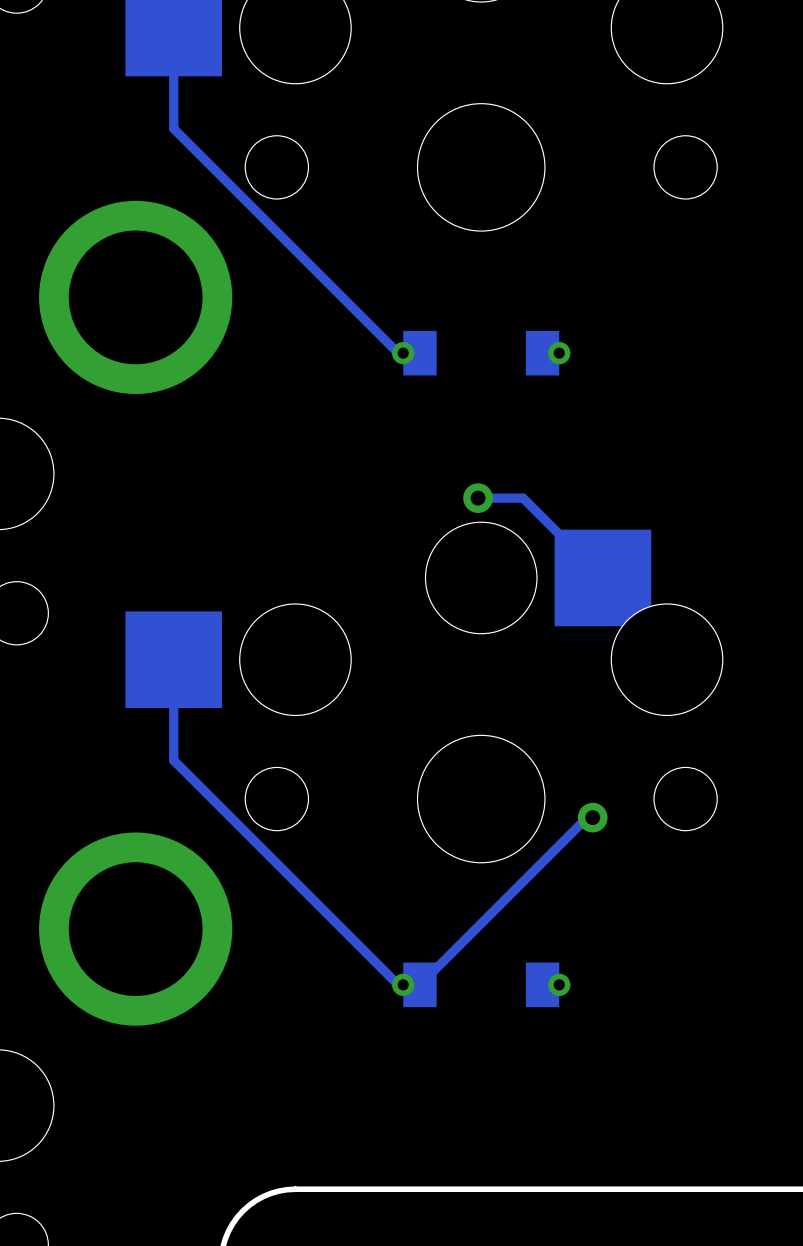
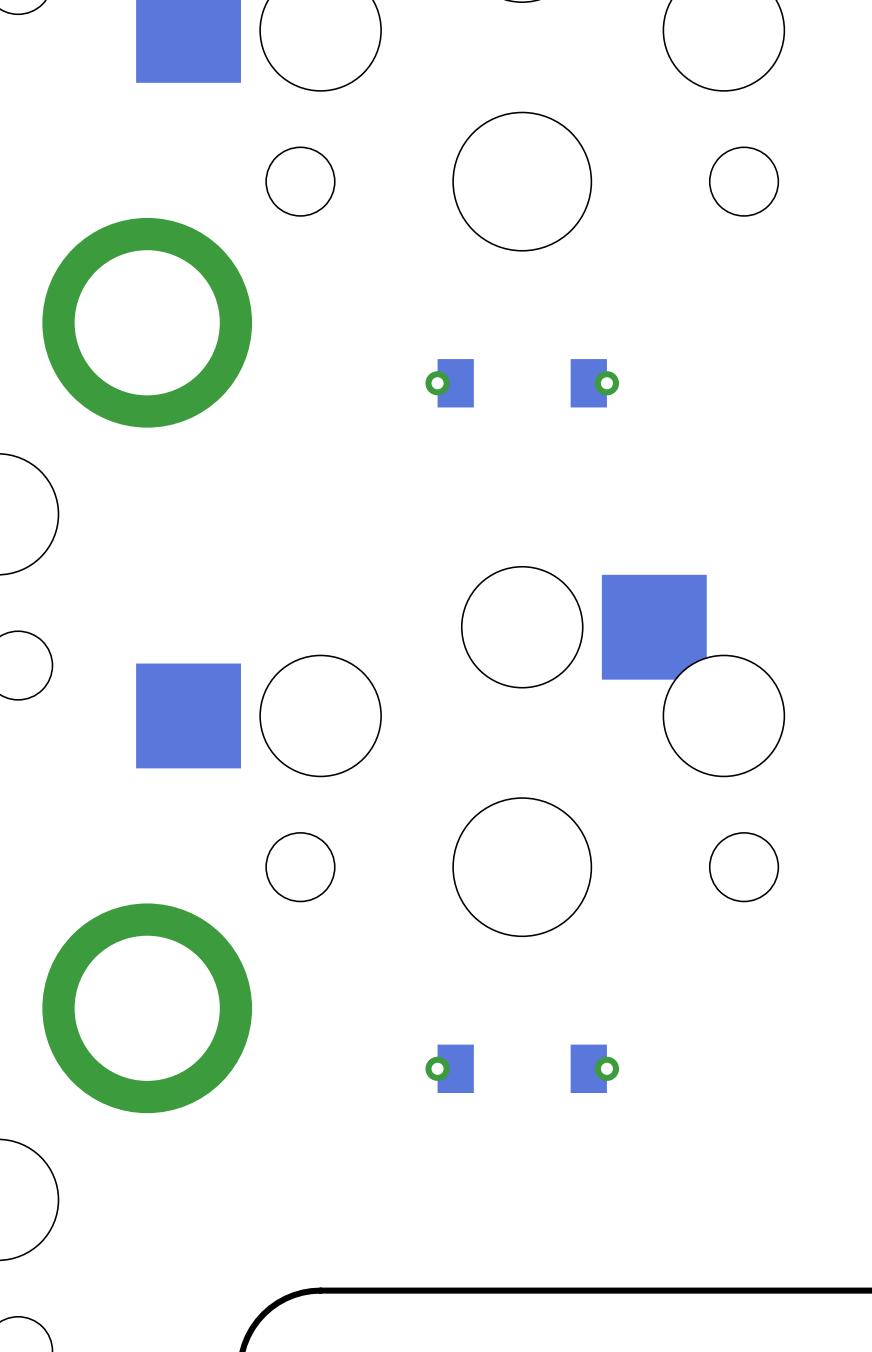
track: (173, 28) (173, 128) (398, 353) (419, 353) -> none
track: (478, 498) (523, 498) (602, 577) -> none
via: (478, 498) -> none
track: (173, 659) (173, 760) (398, 984) (419, 984) (587, 817) (592, 817) -> none
via: (592, 817) -> none

